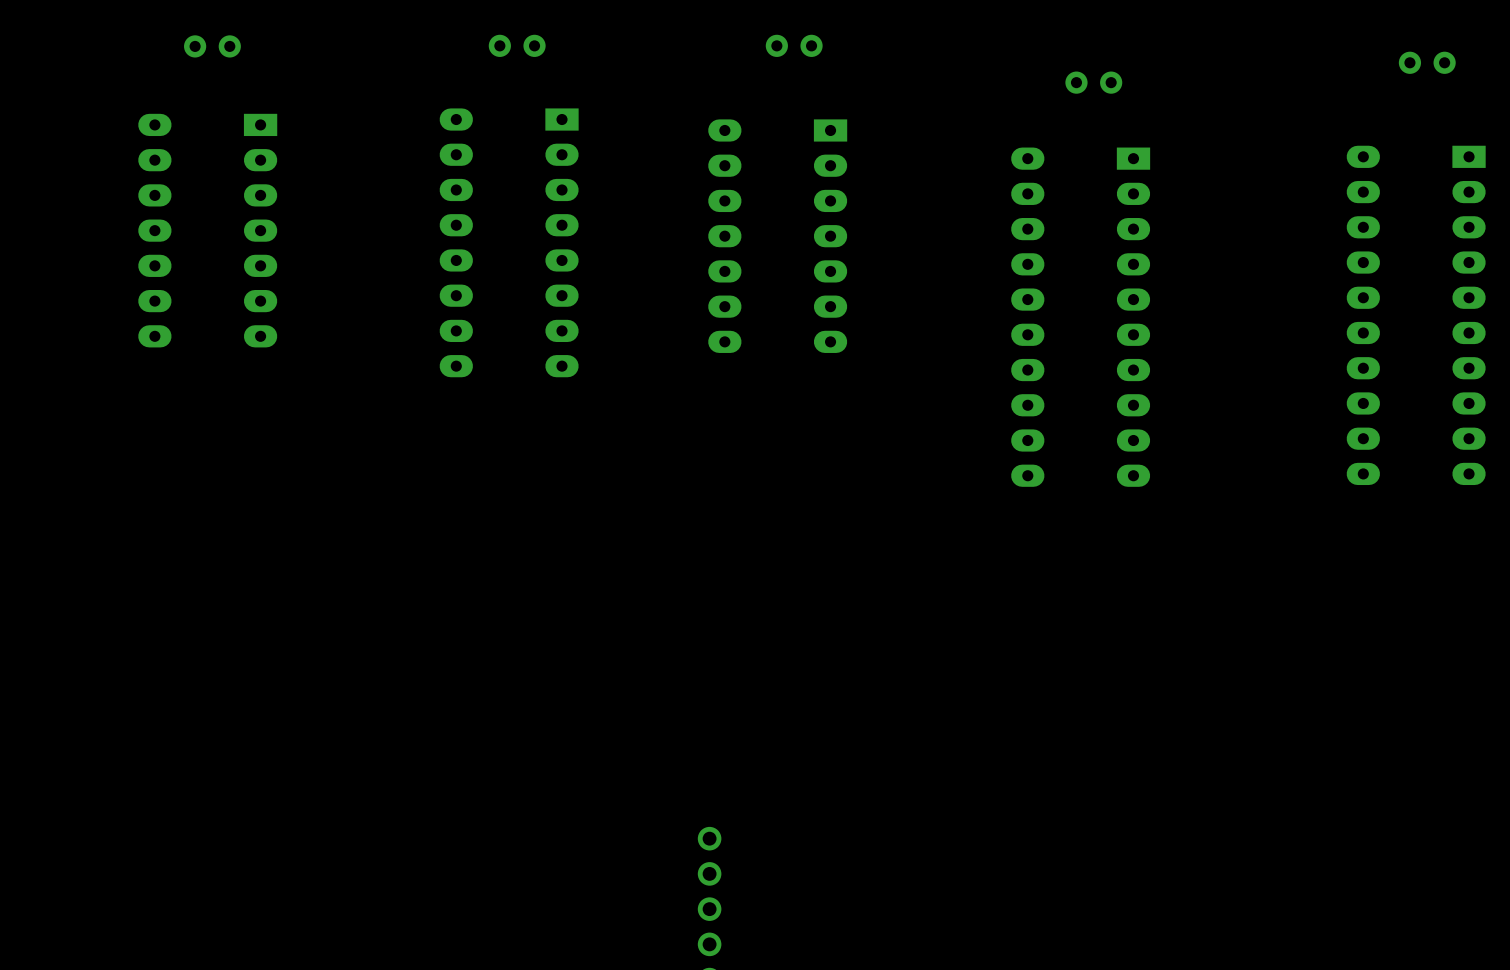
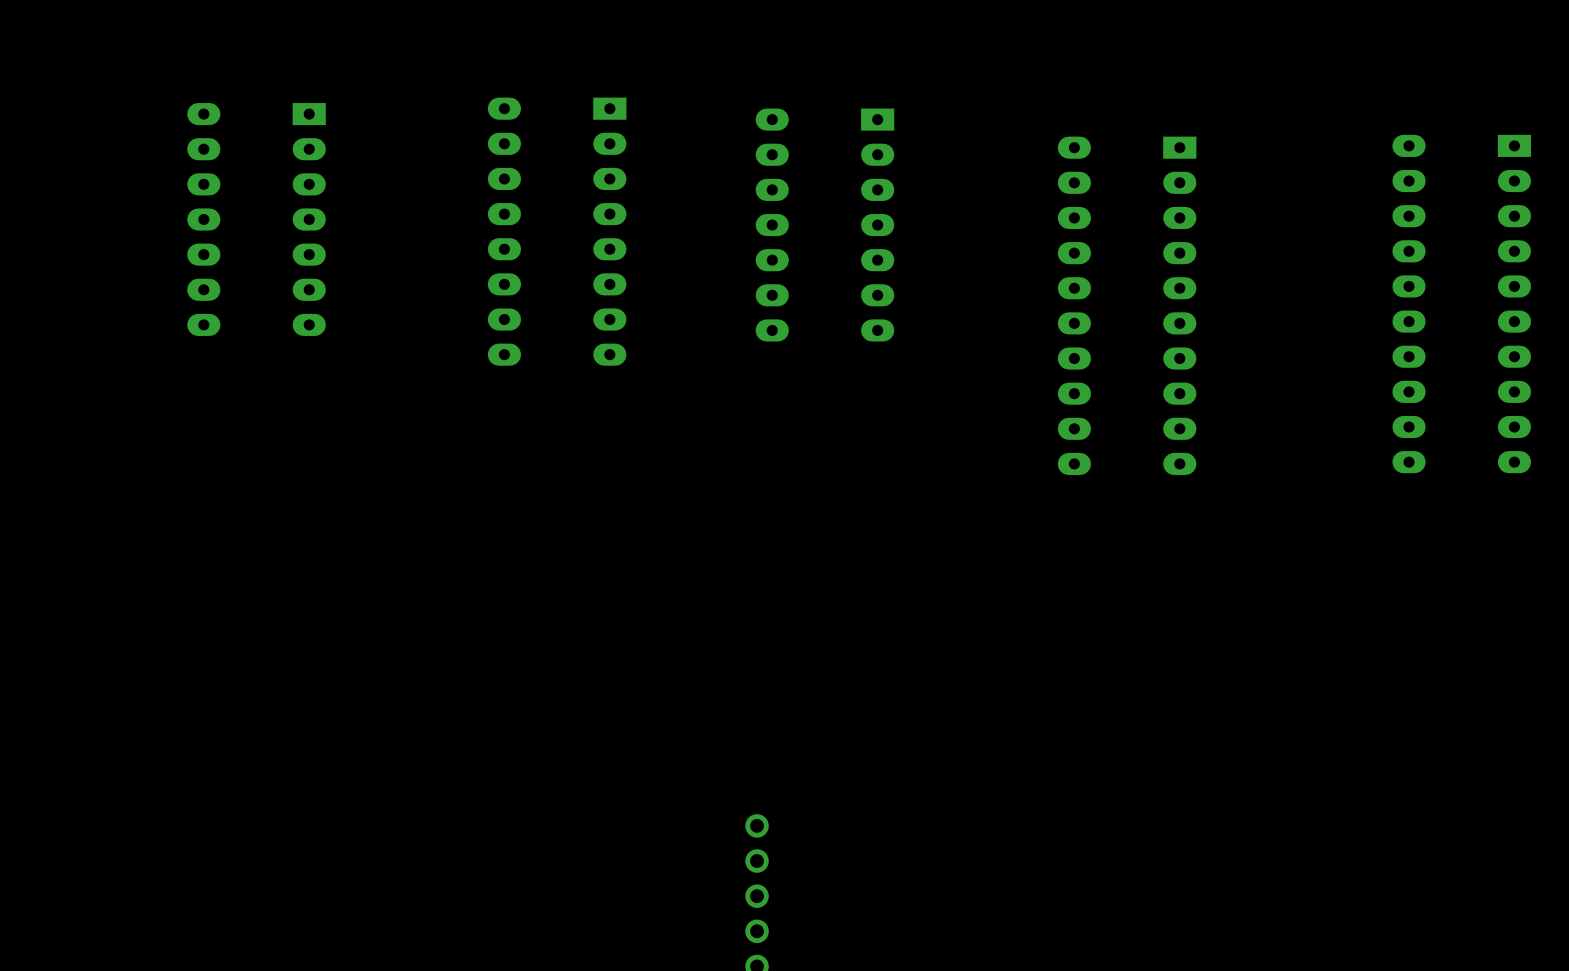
part: (517, 45) -> none
part: (794, 45) -> none
part: (212, 46) -> none
part: (1427, 62) -> none
part: (1093, 82) -> none

